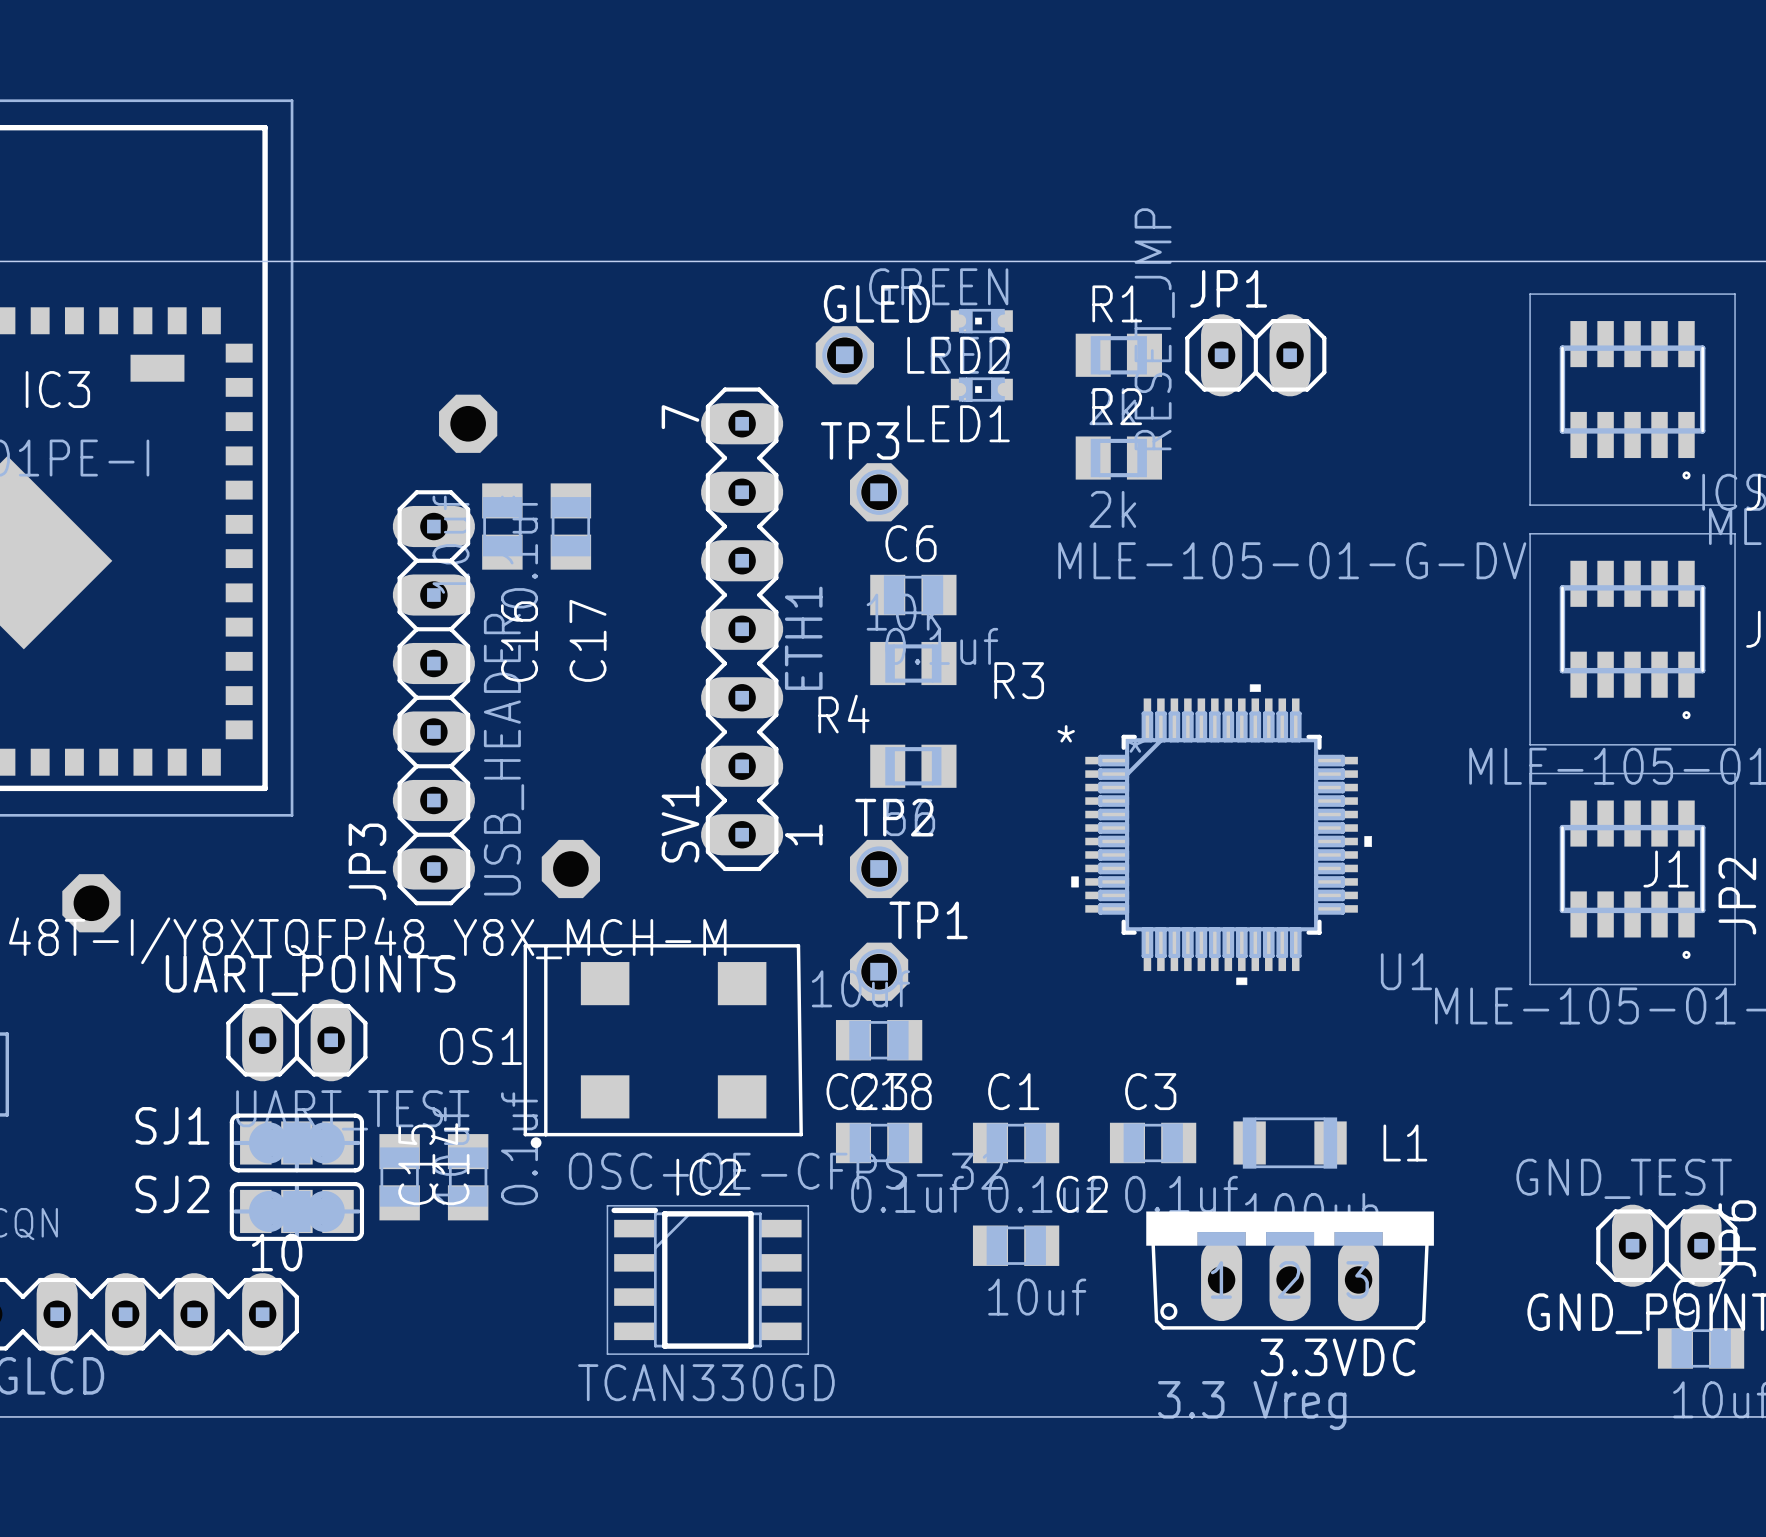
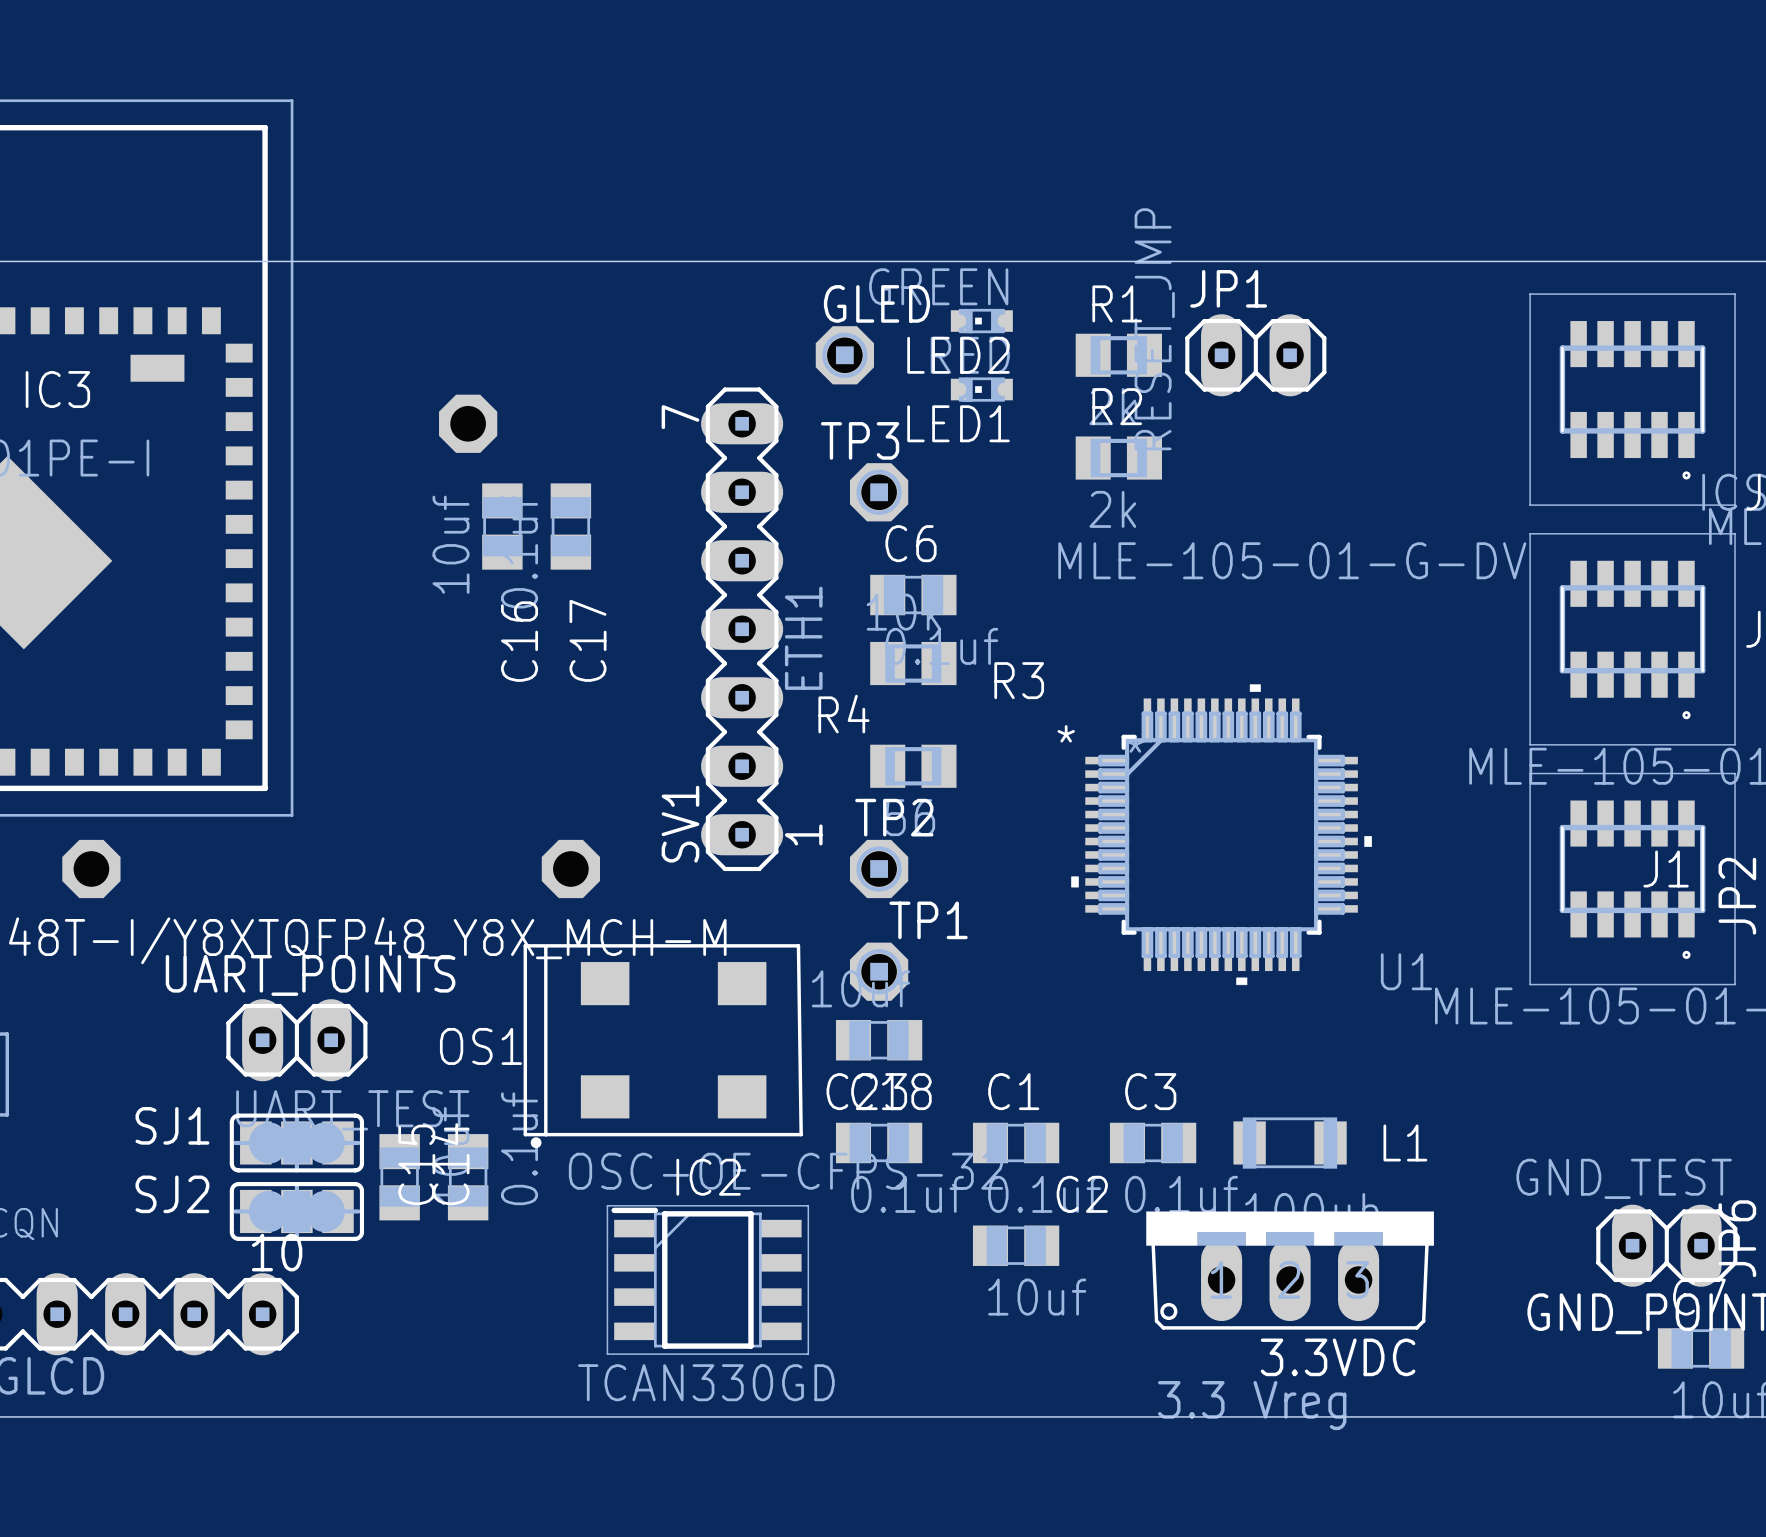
JP3: USB_HEADER (433, 697) -> none
part position: (91, 903) -> (91, 869)

